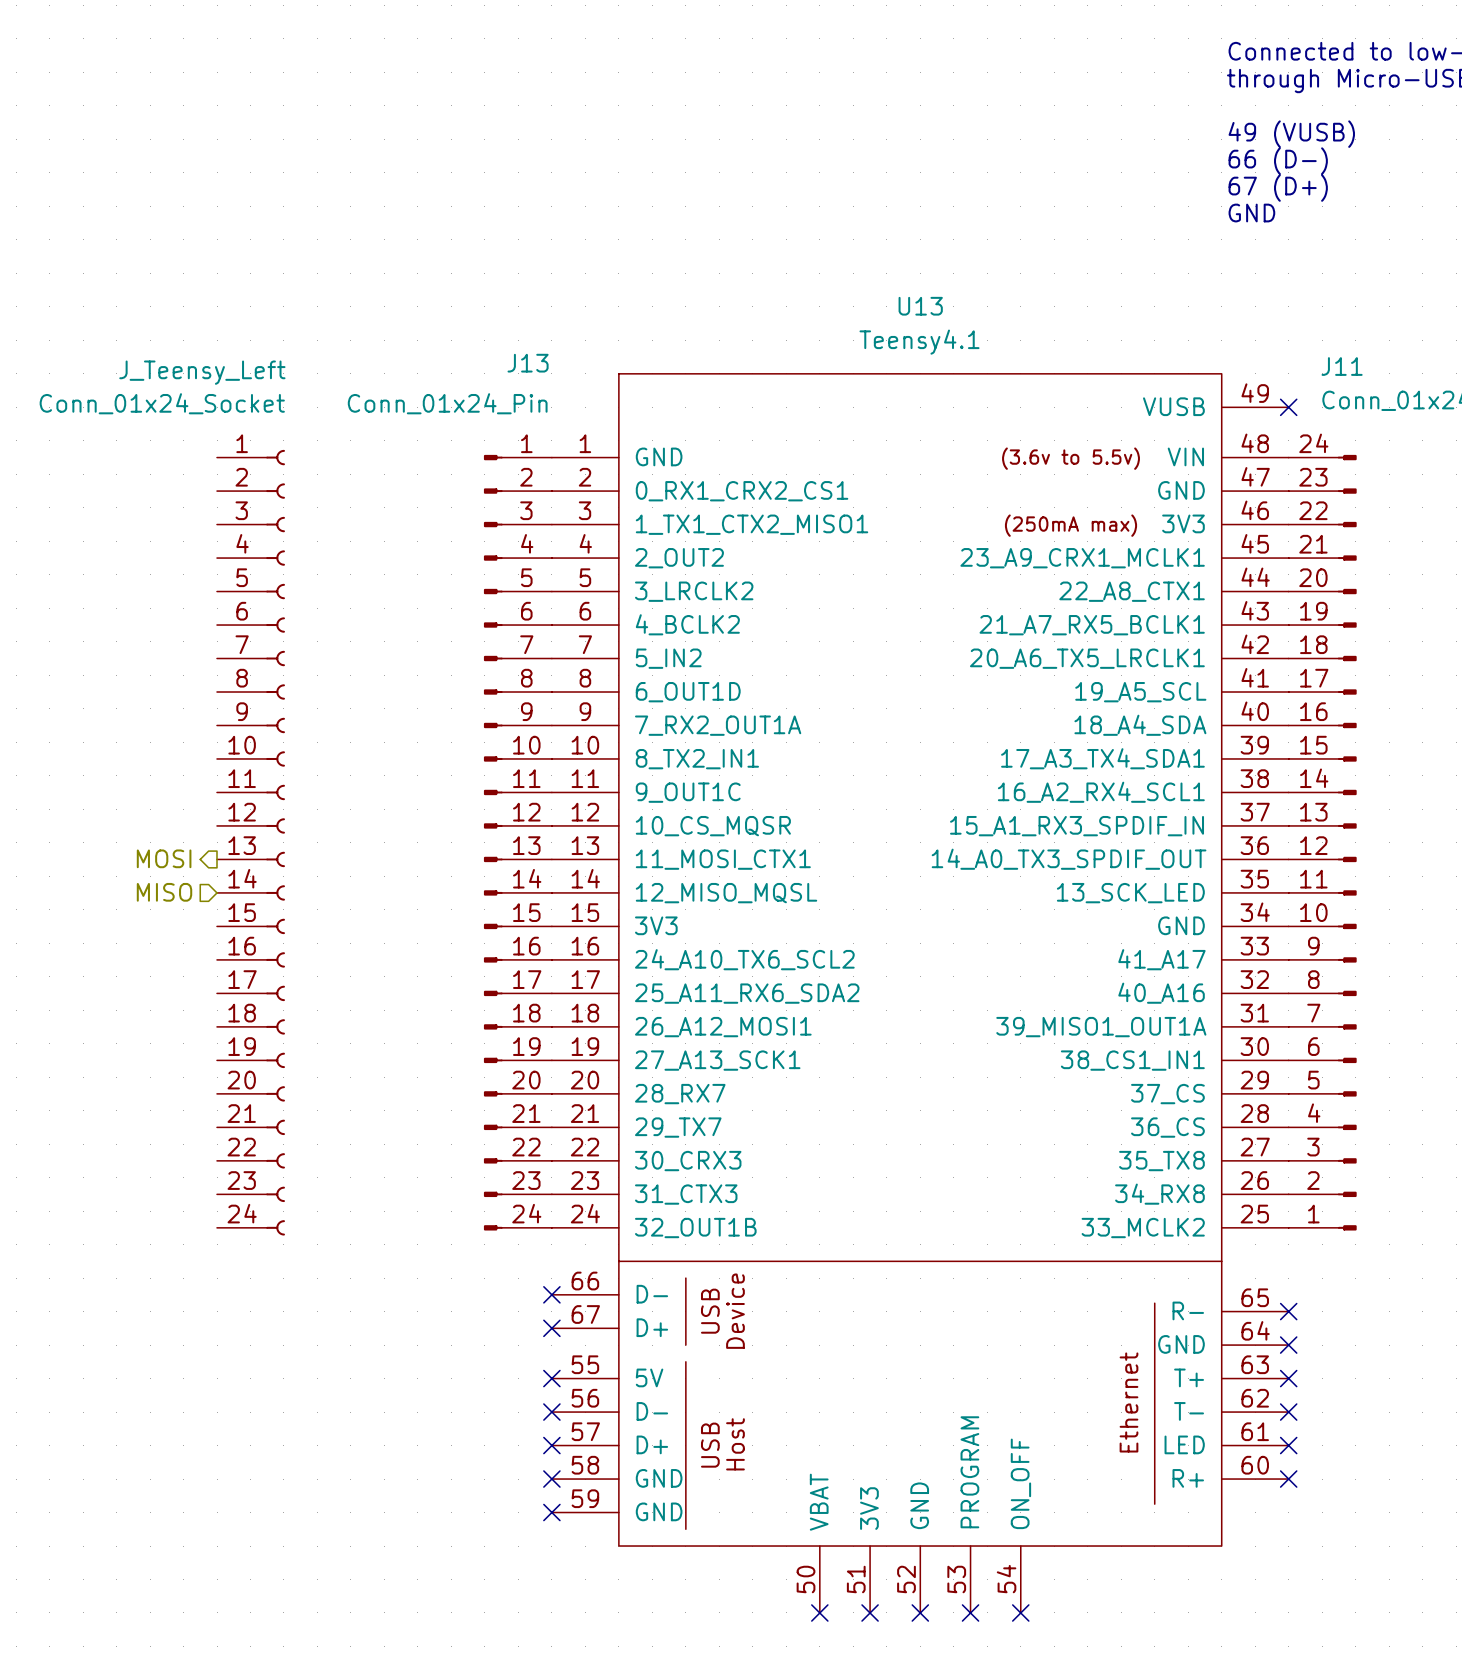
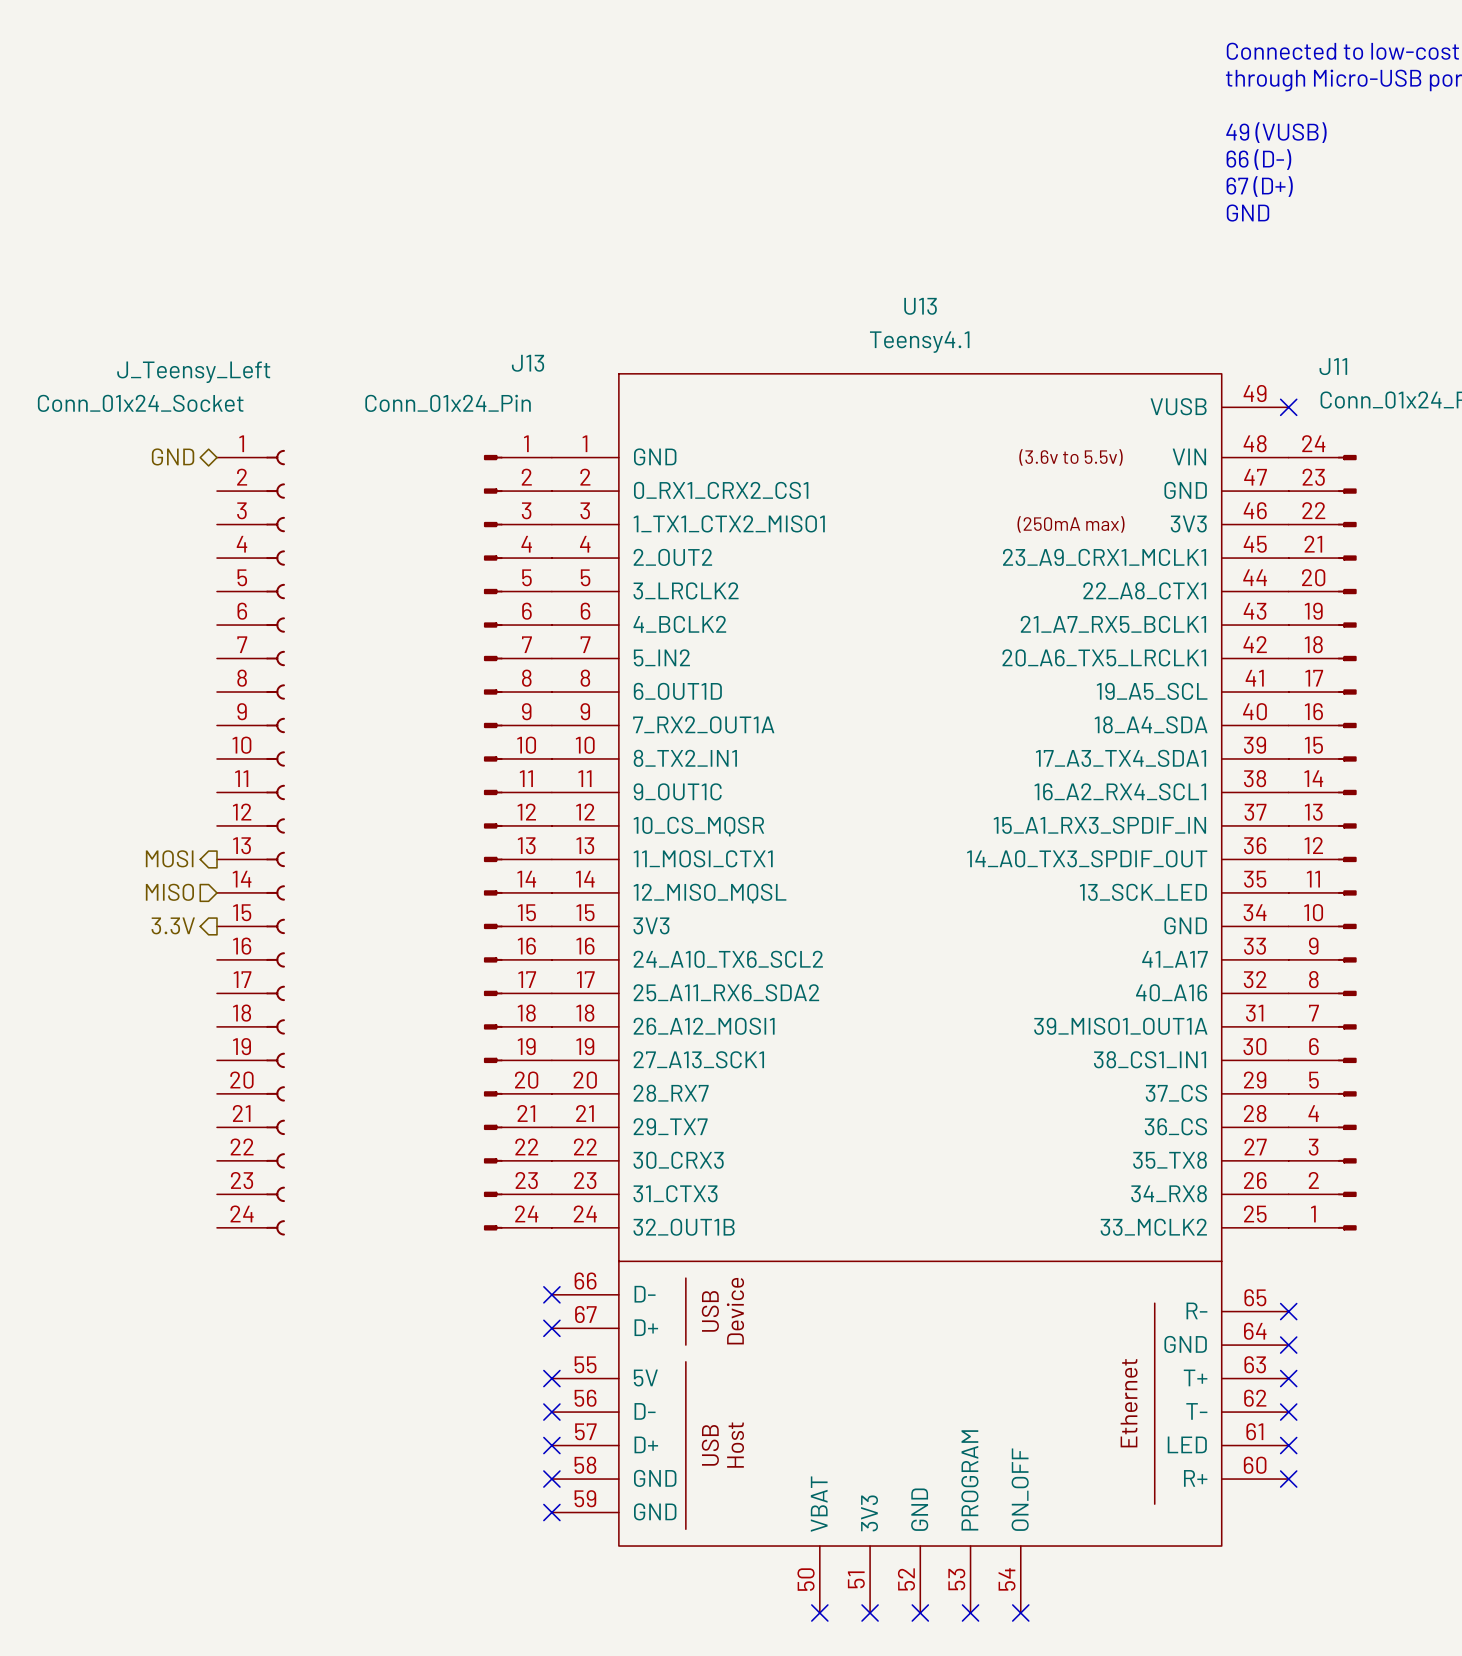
hierarchical label: none -> GND (173, 456)
hierarchical label: none -> 3.3V (173, 925)

